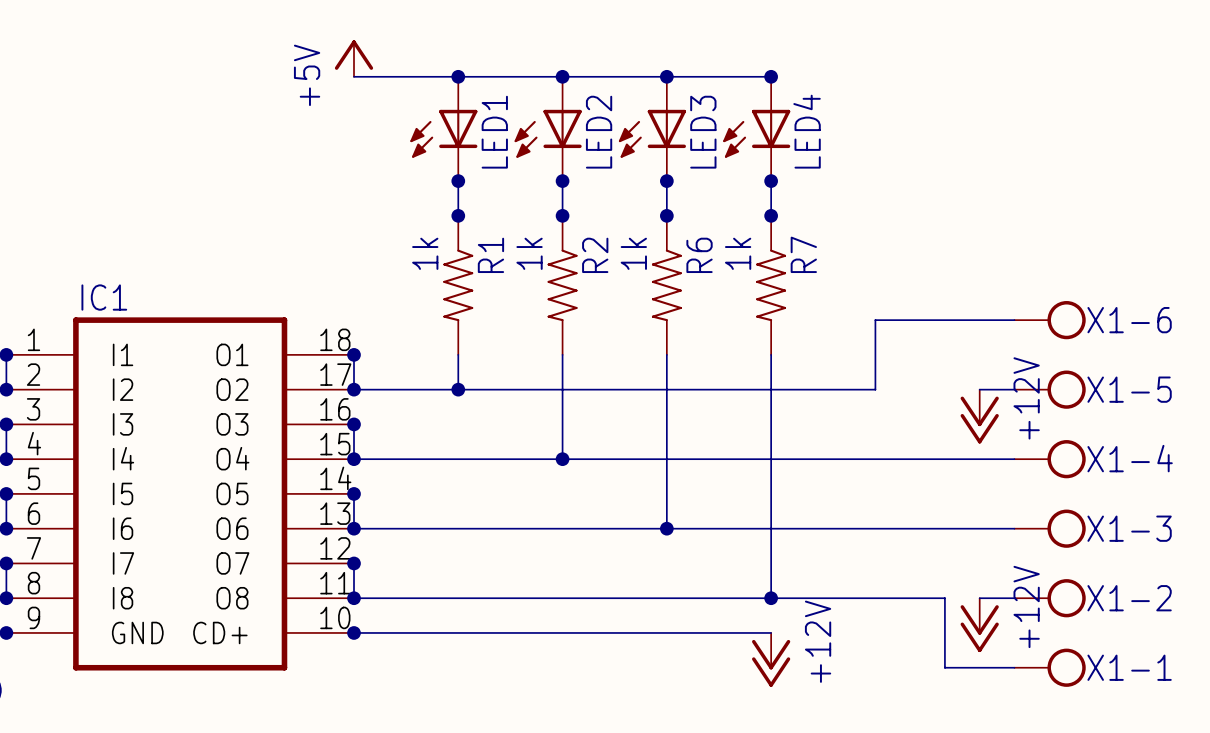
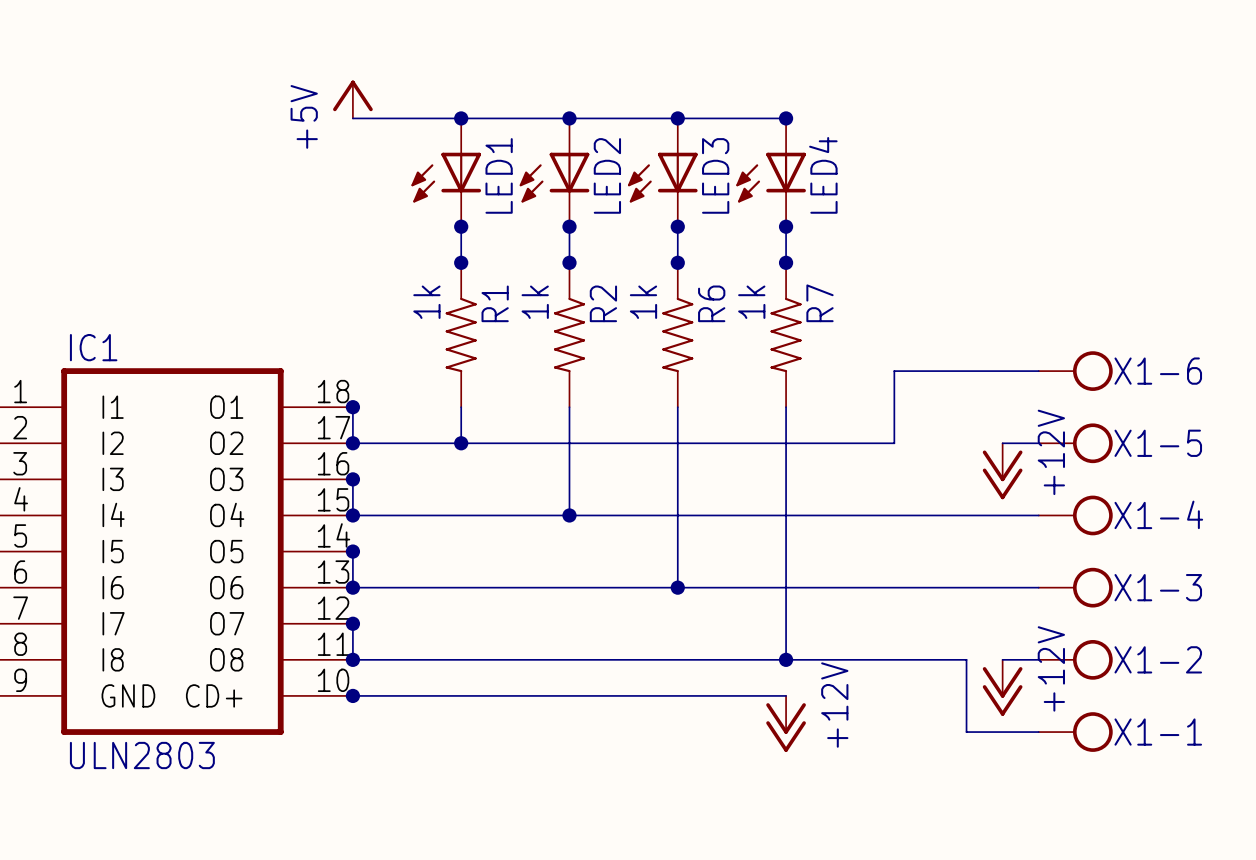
IC1 value: none -> ULN2803 (142, 755)

